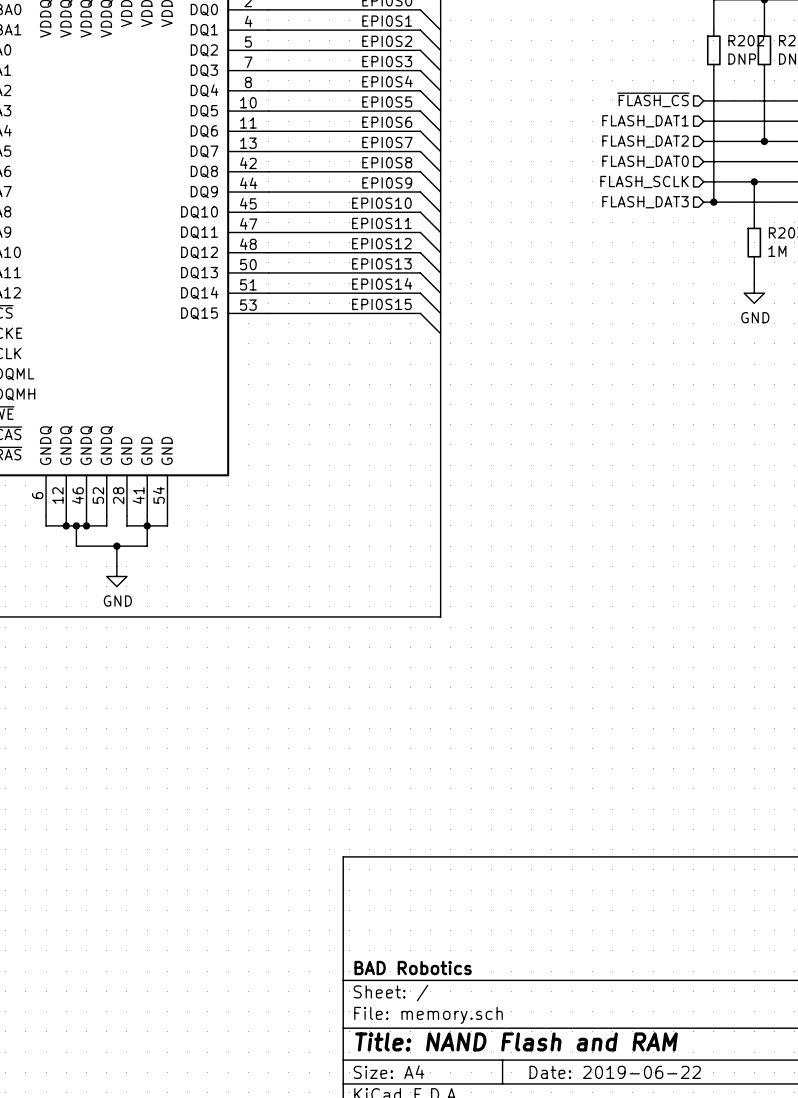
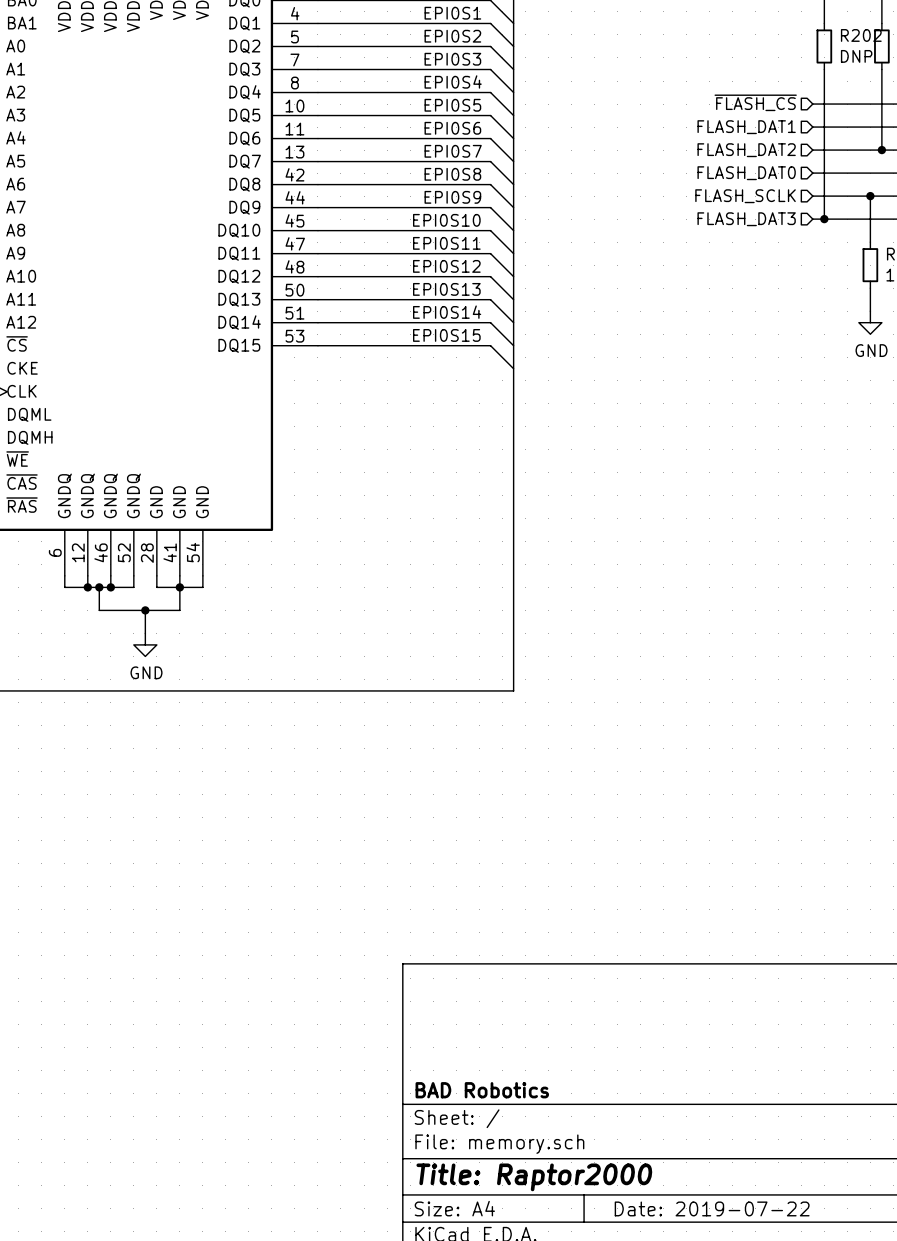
title block: Title: NAND Flash and RAM (516, 1041) -> Title: Raptor2000 (534, 1177)
title block: Date: 2019-06-22 (615, 1072) -> Date: 2019-07-22 (712, 1208)

